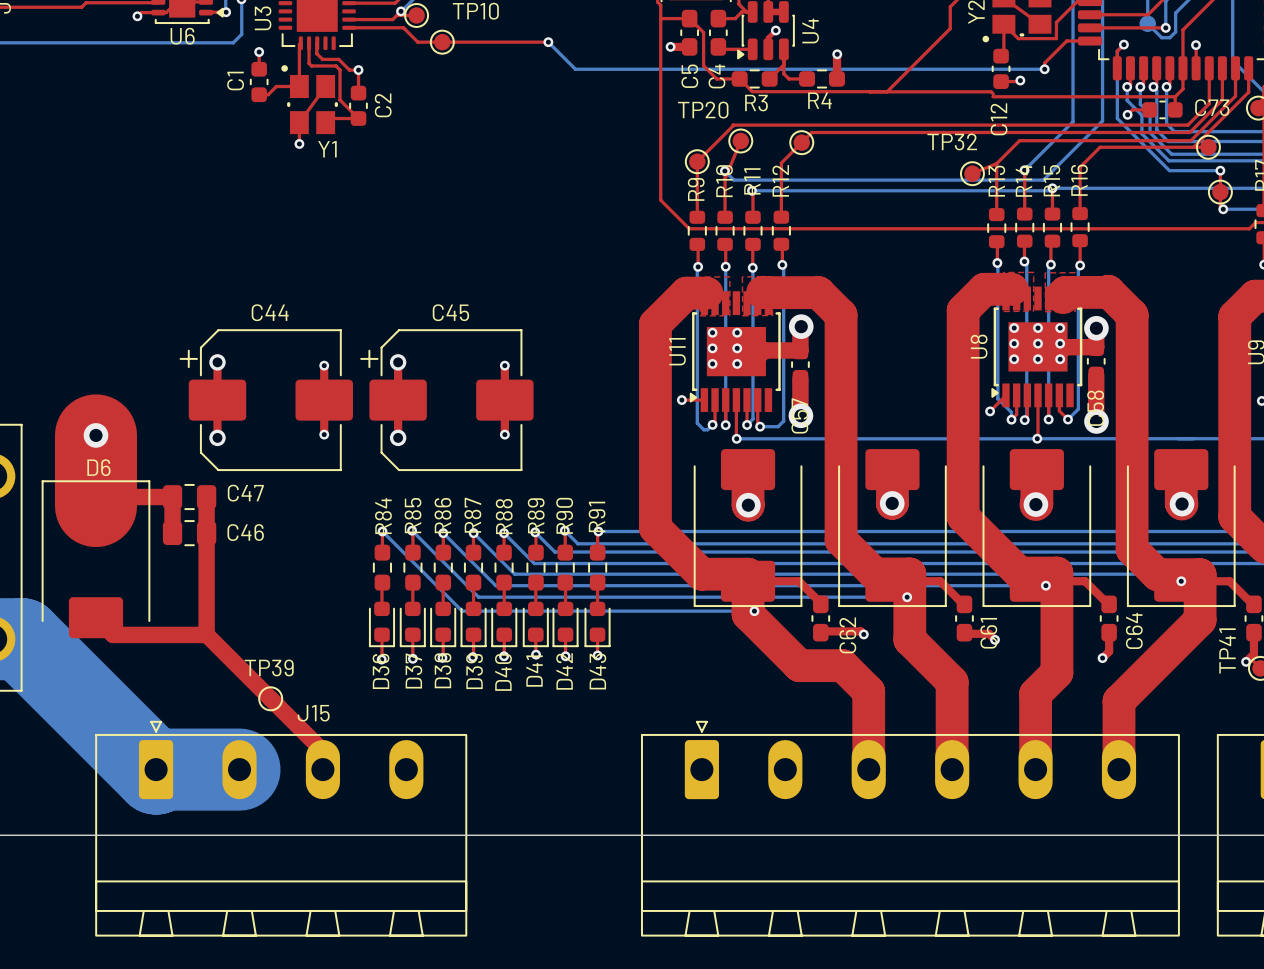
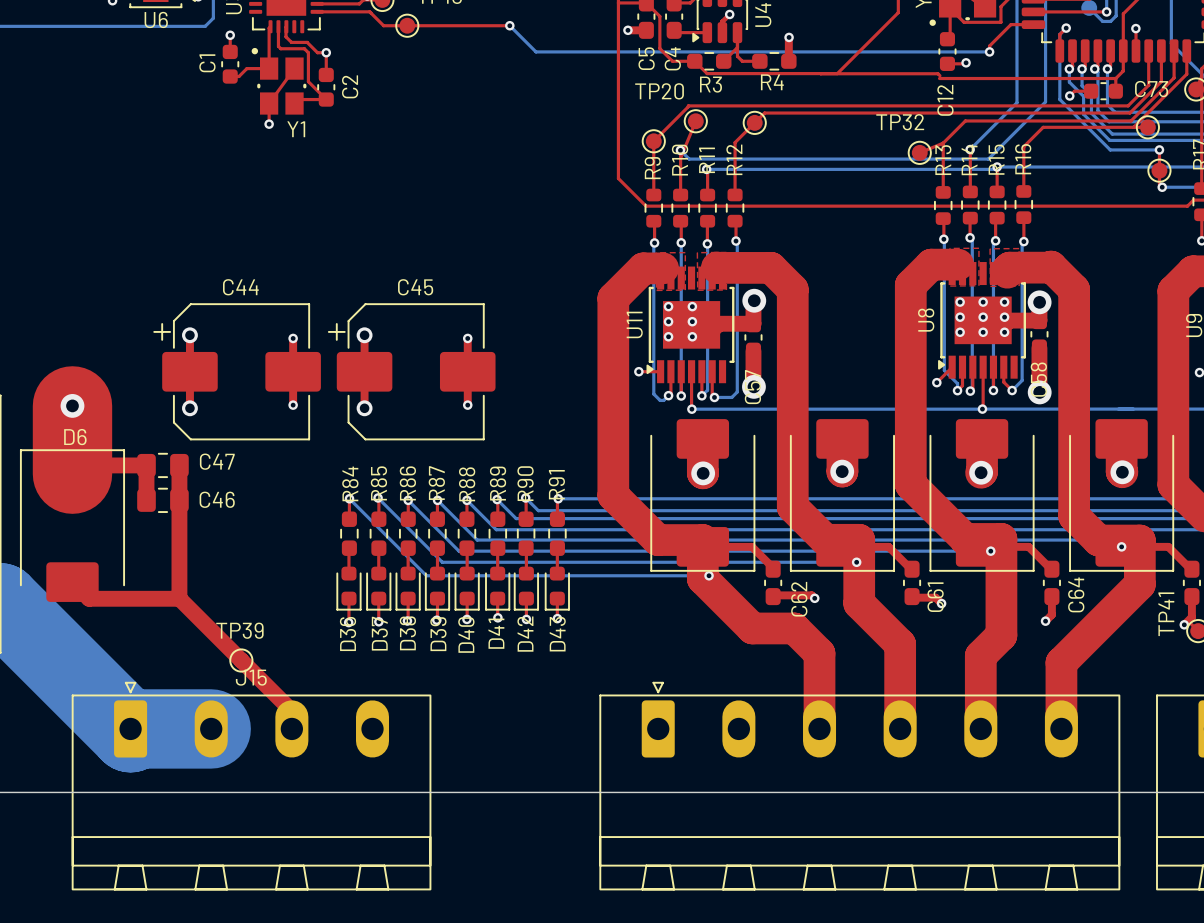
J15 name position: J15 (313, 713) -> J15 (251, 677)

